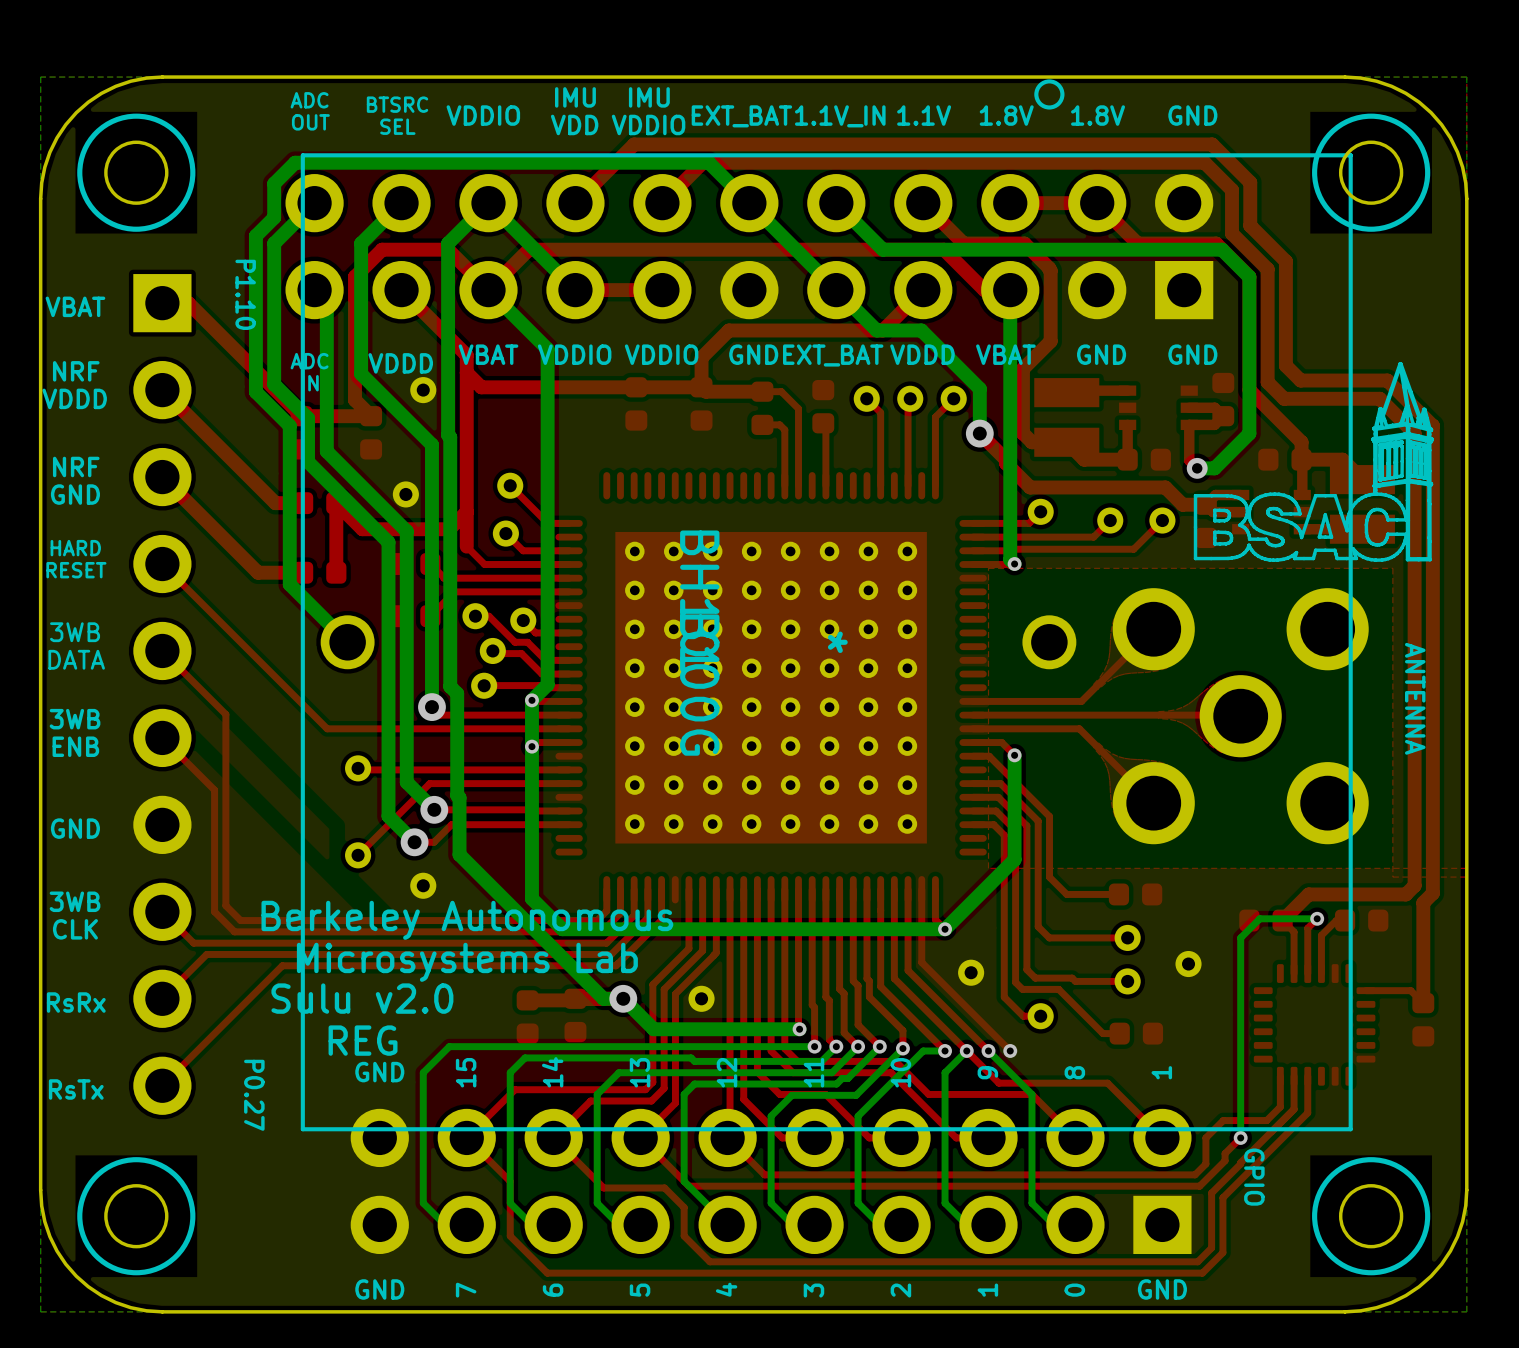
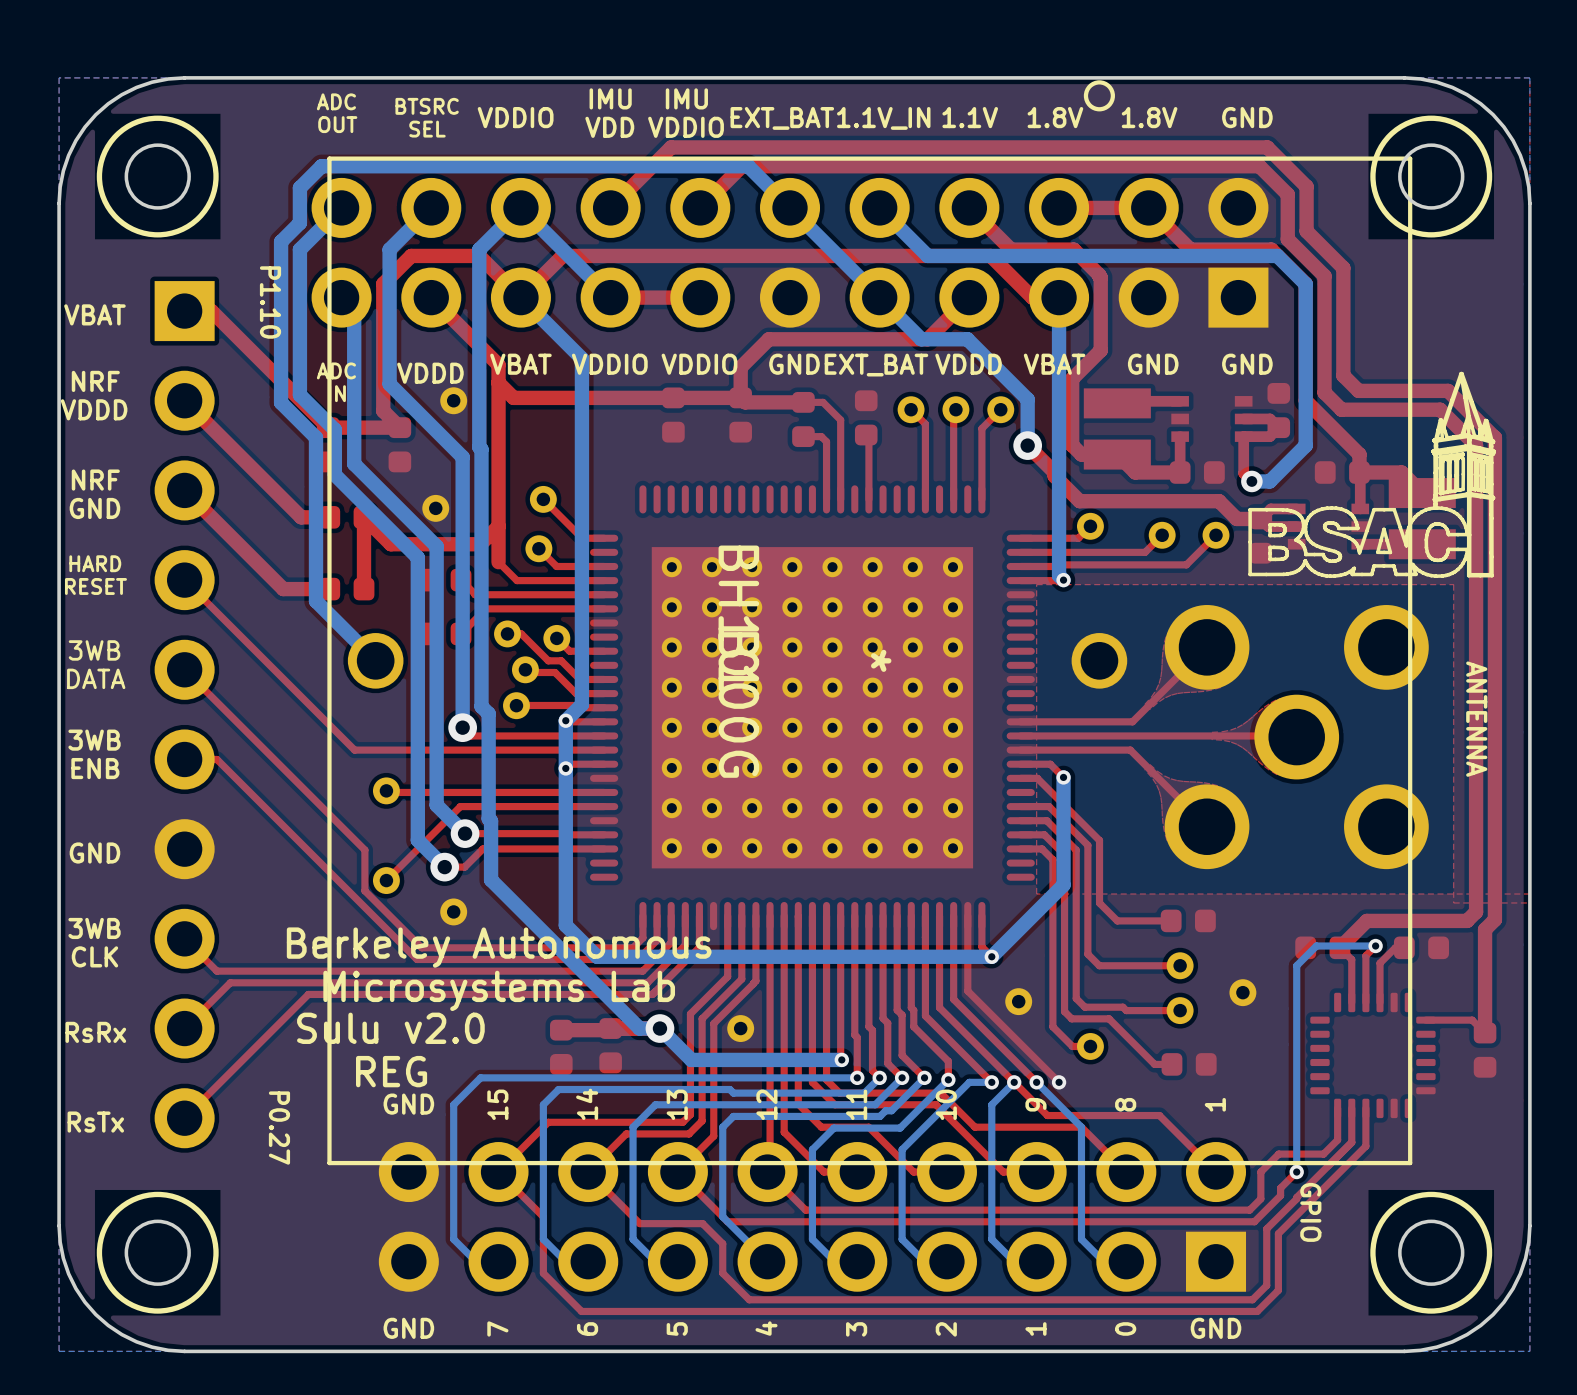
top track: (225, 714) (225, 905) (240, 920) (392, 920) -> (250, 735) (364, 850) (364, 890) (421, 947)
top track: (162, 737) (214, 790) (214, 911) (234, 931) (387, 931) -> (184, 759) (217, 759) (417, 959)

